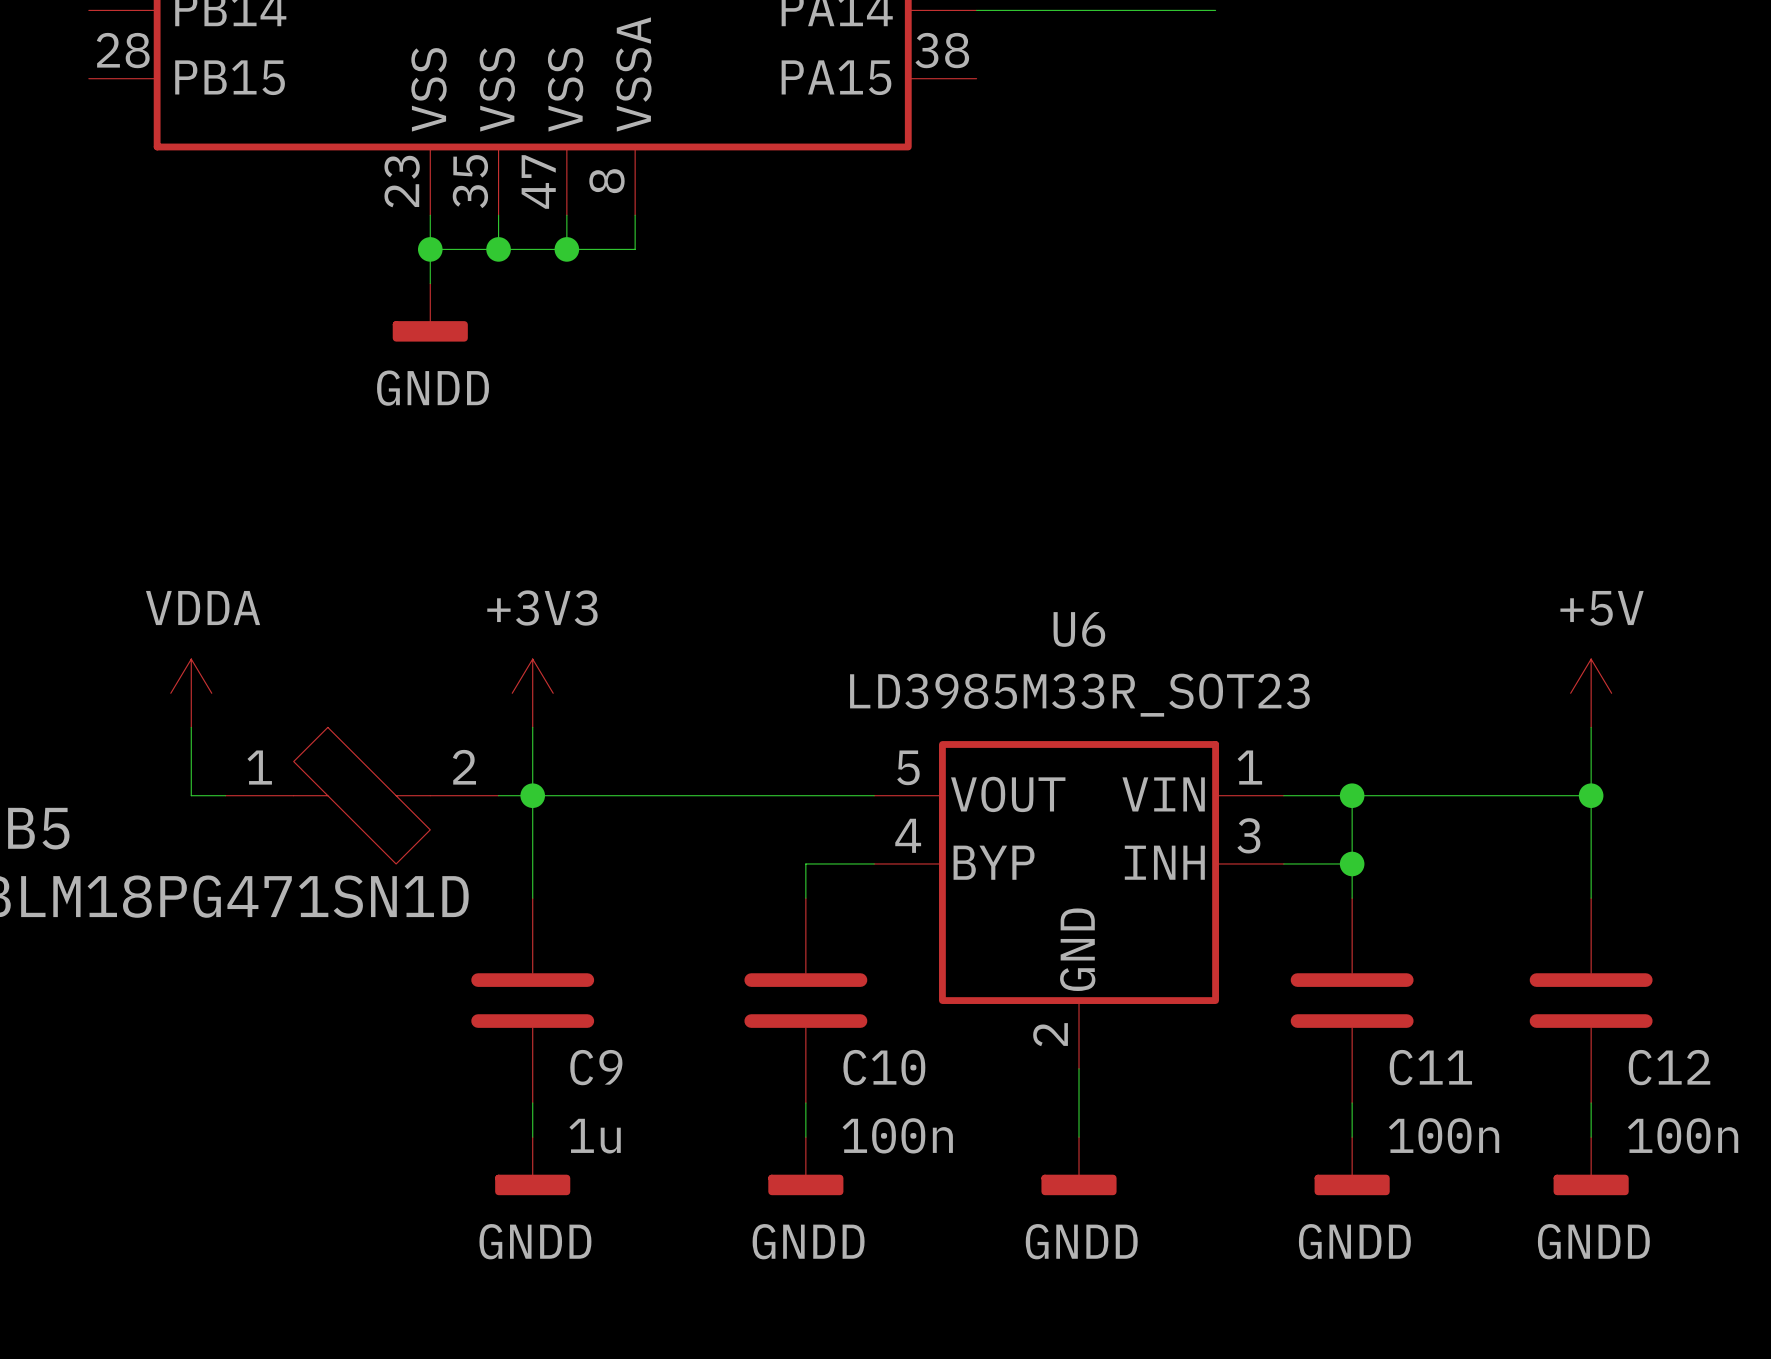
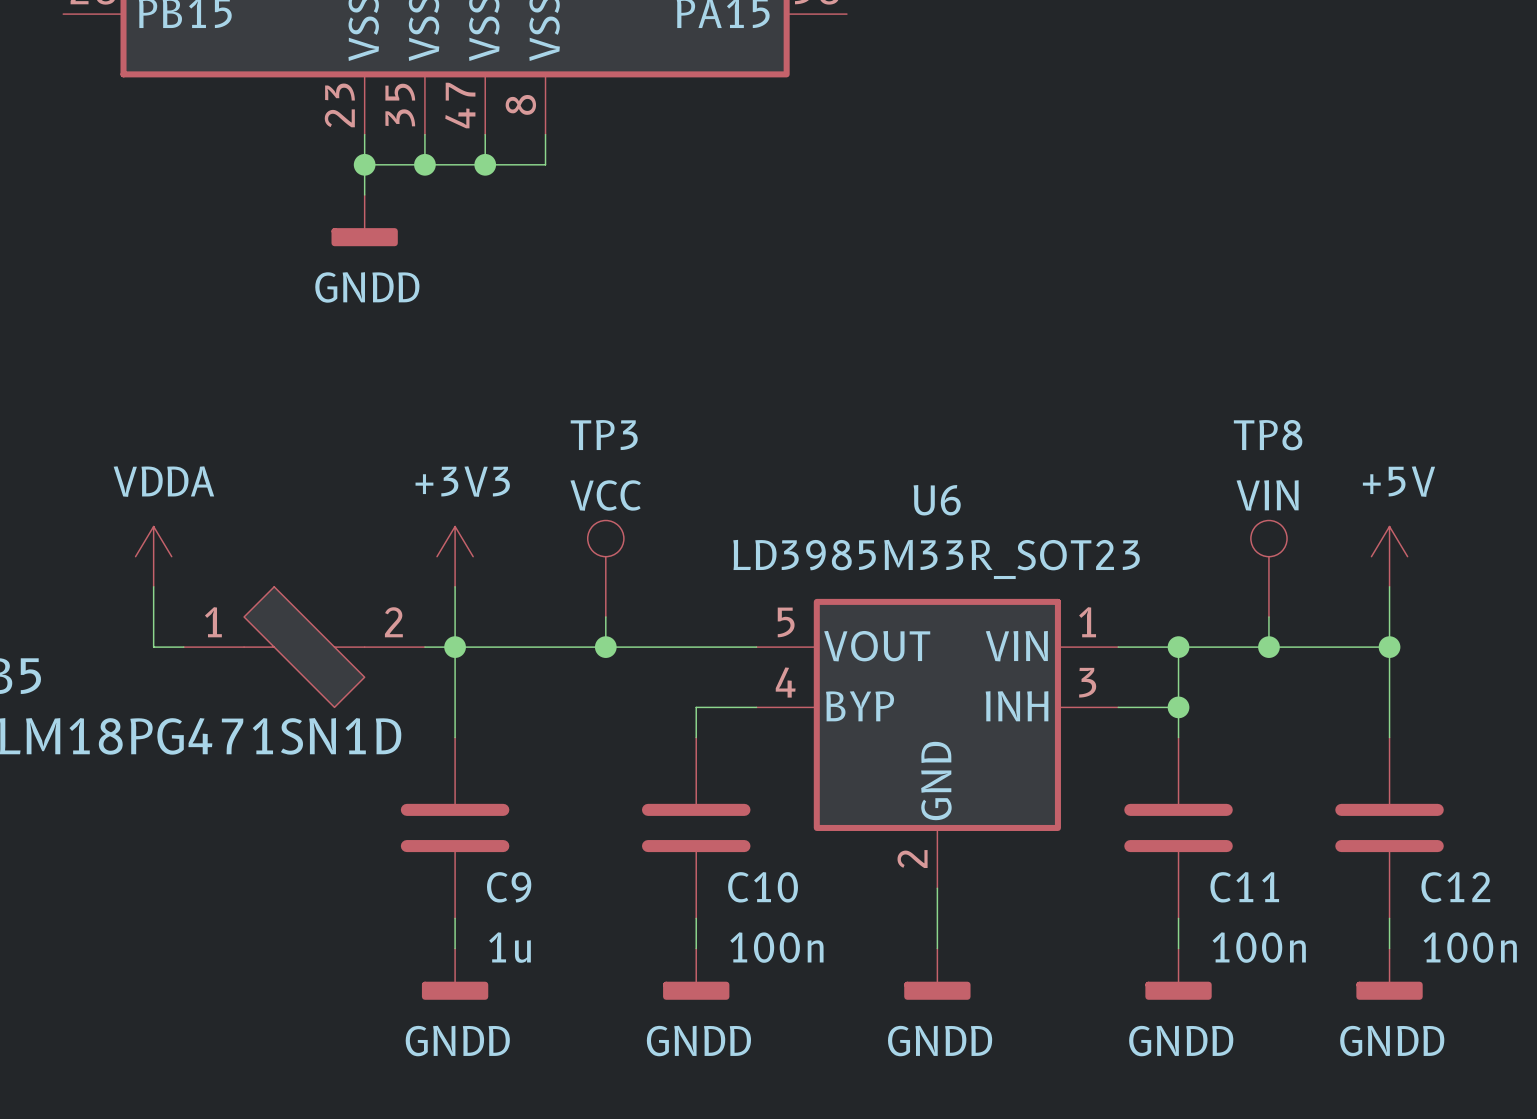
TP3: none -> VCC (605, 568)
TP8: none -> VIN (1268, 568)
wire: none -> (605, 616) (605, 647)
wire: none -> (1268, 616) (1268, 647)
junction: none -> (605, 647)
junction: none -> (1268, 647)

